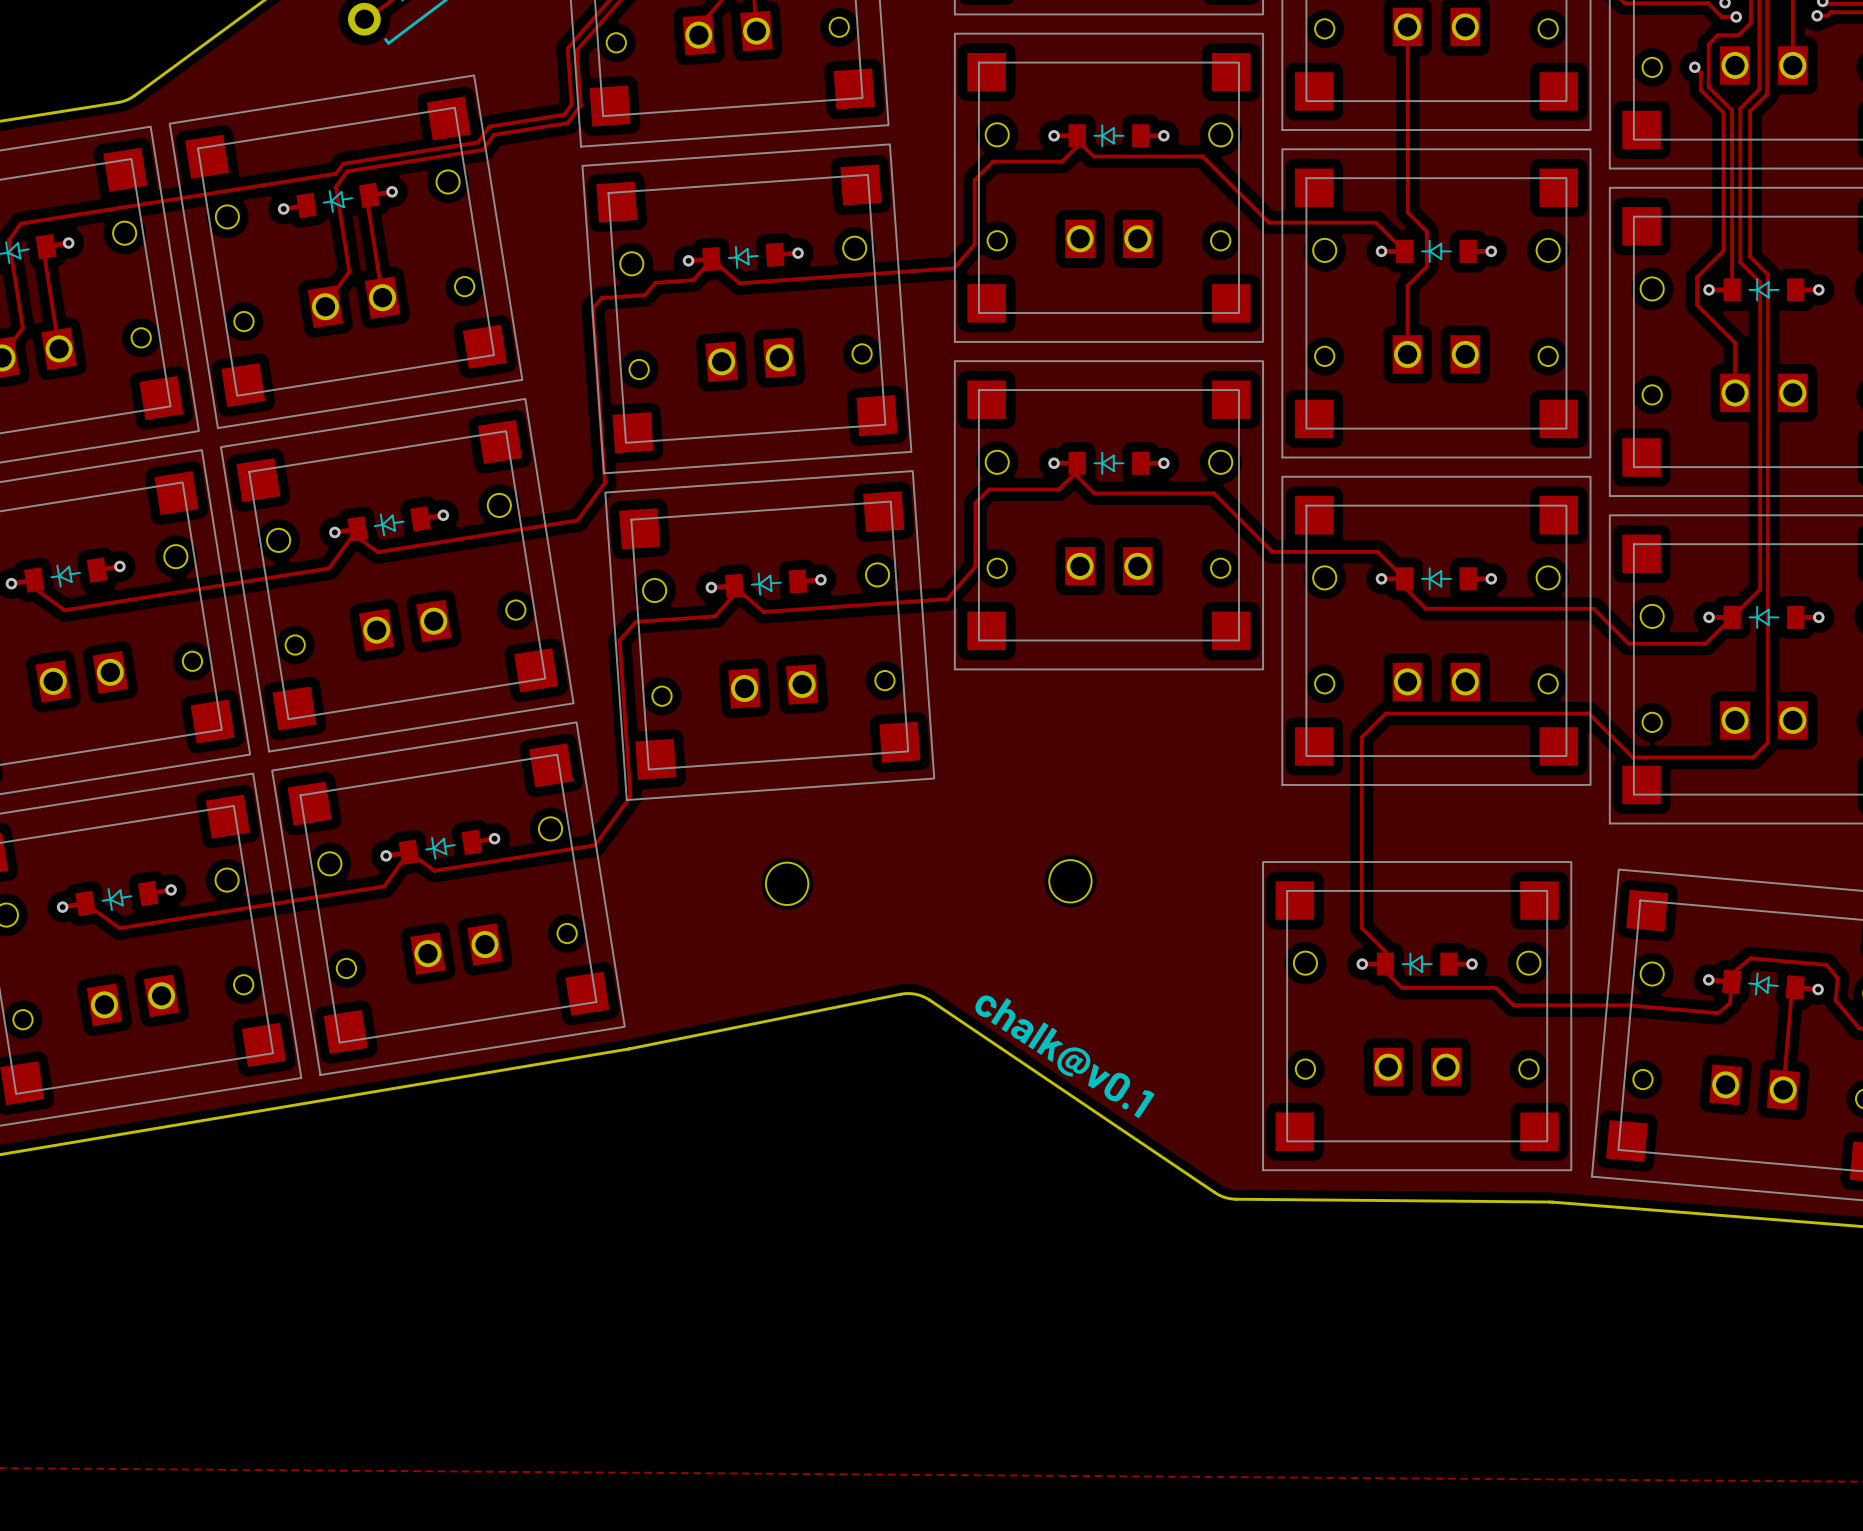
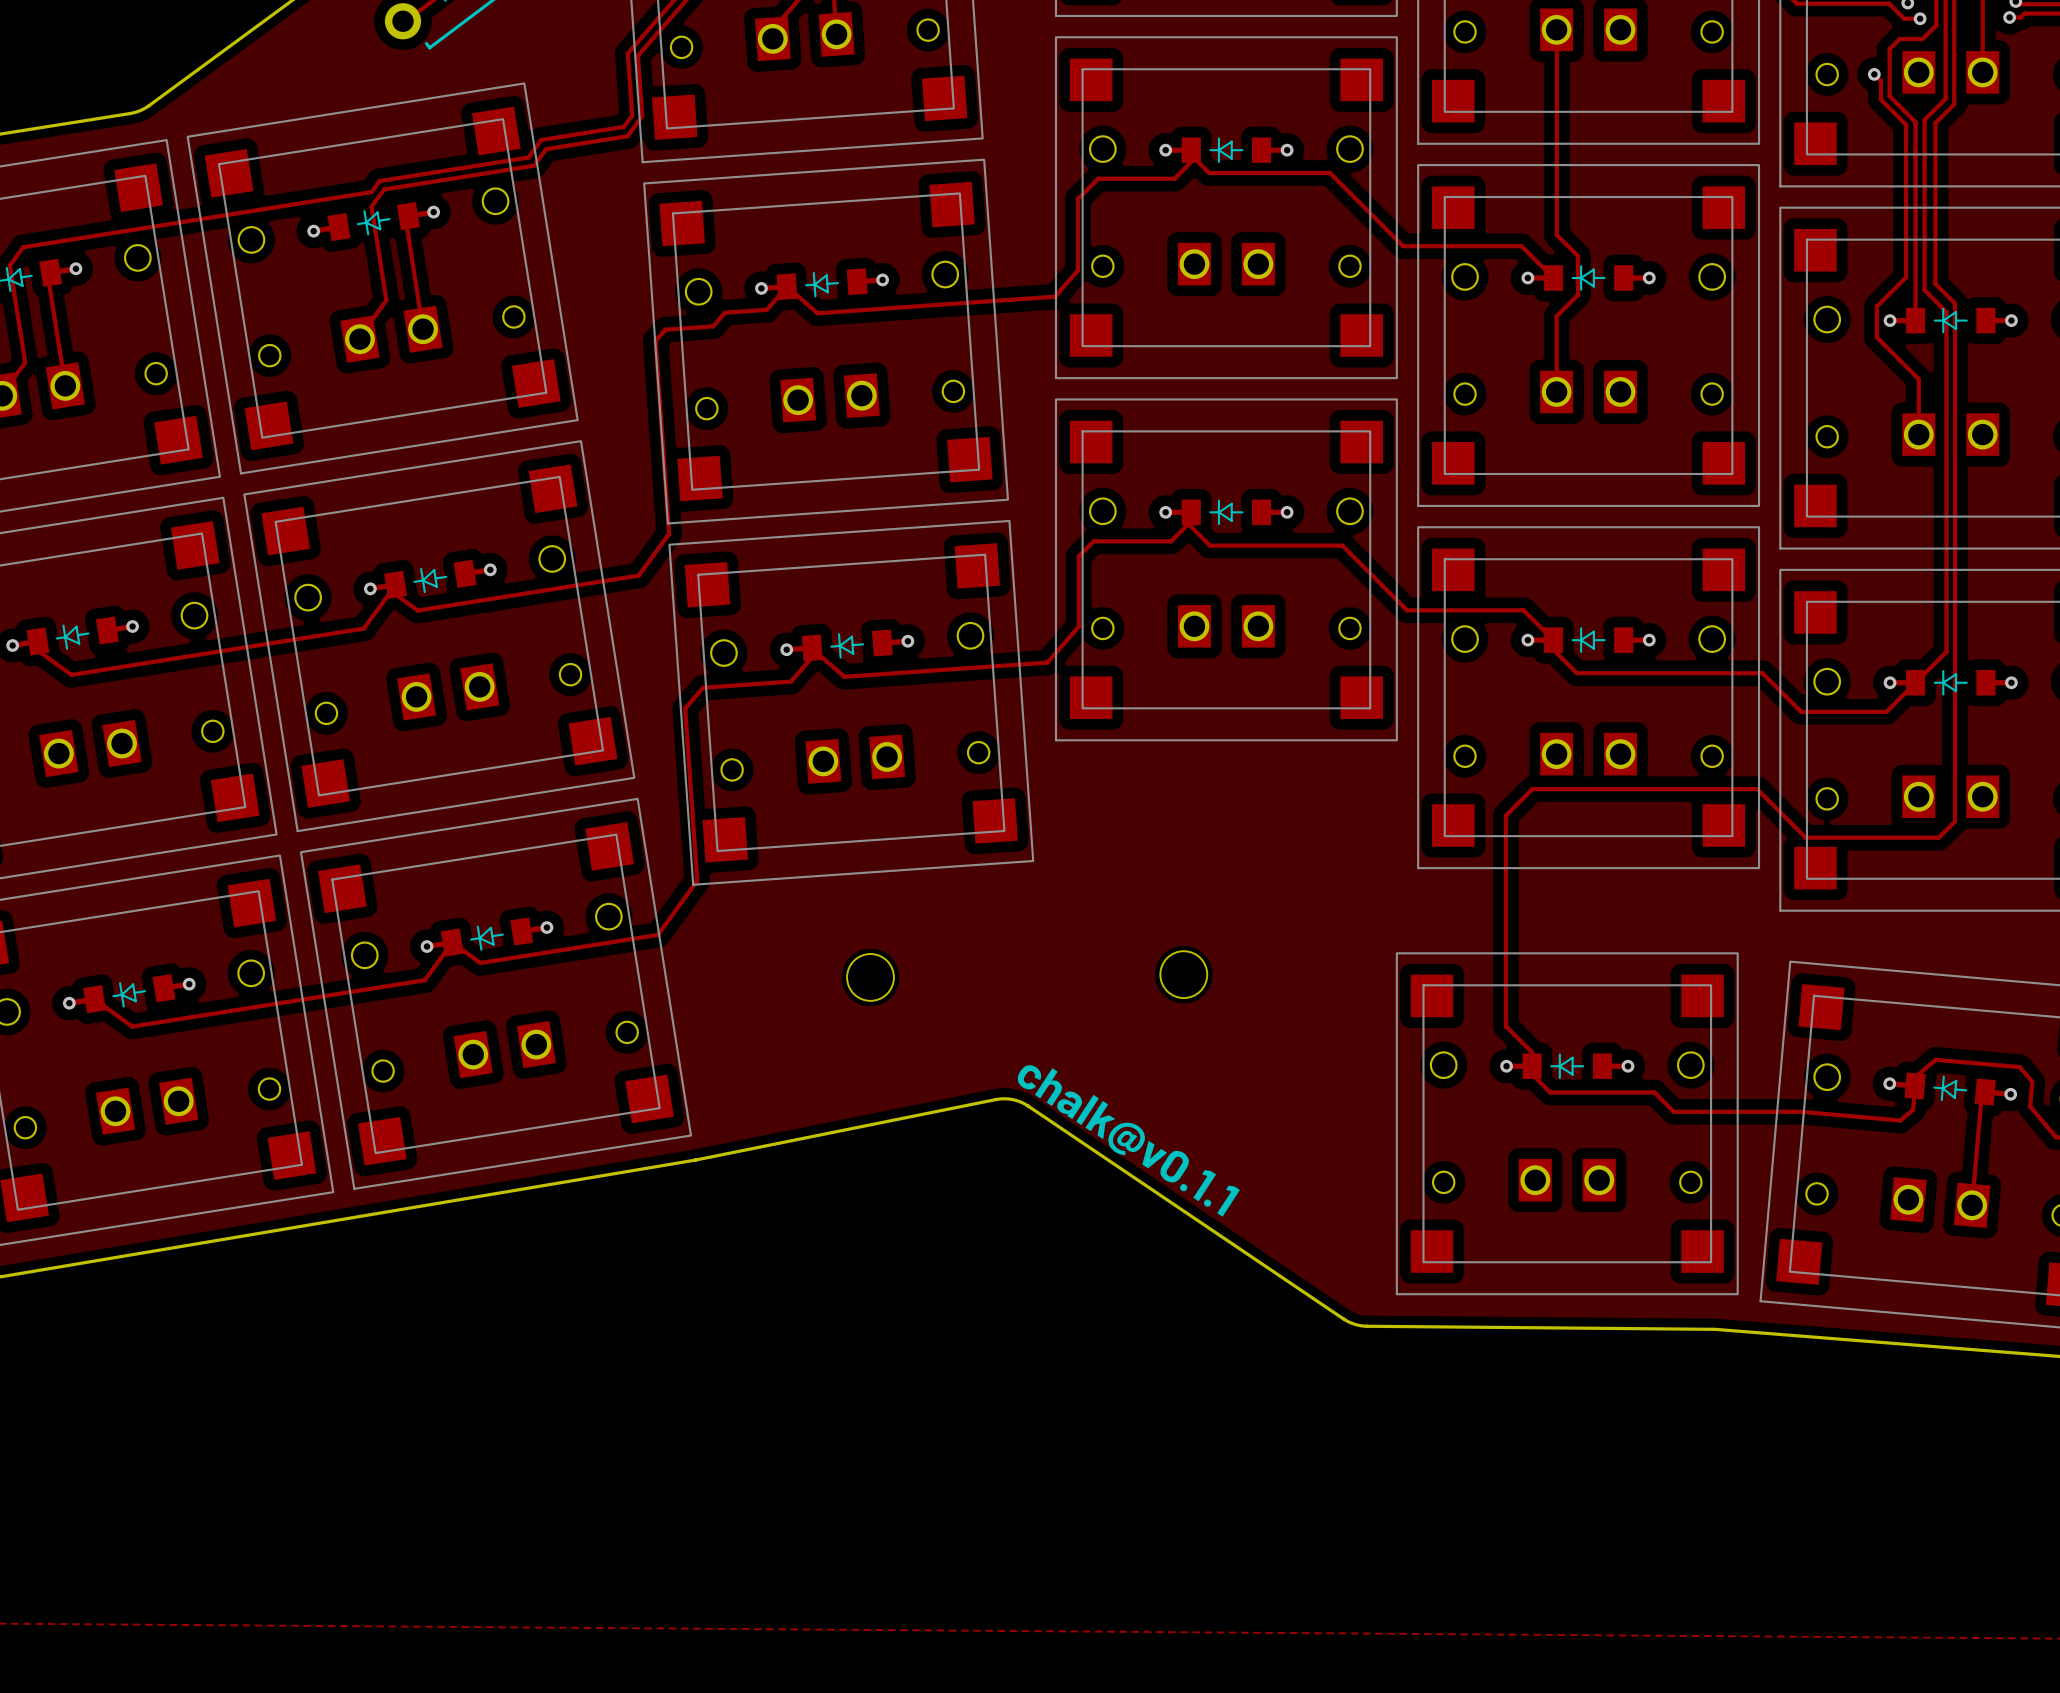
text: chalk@v0.1 (1064, 1056) -> chalk@v0.1.1 (1128, 1140)

